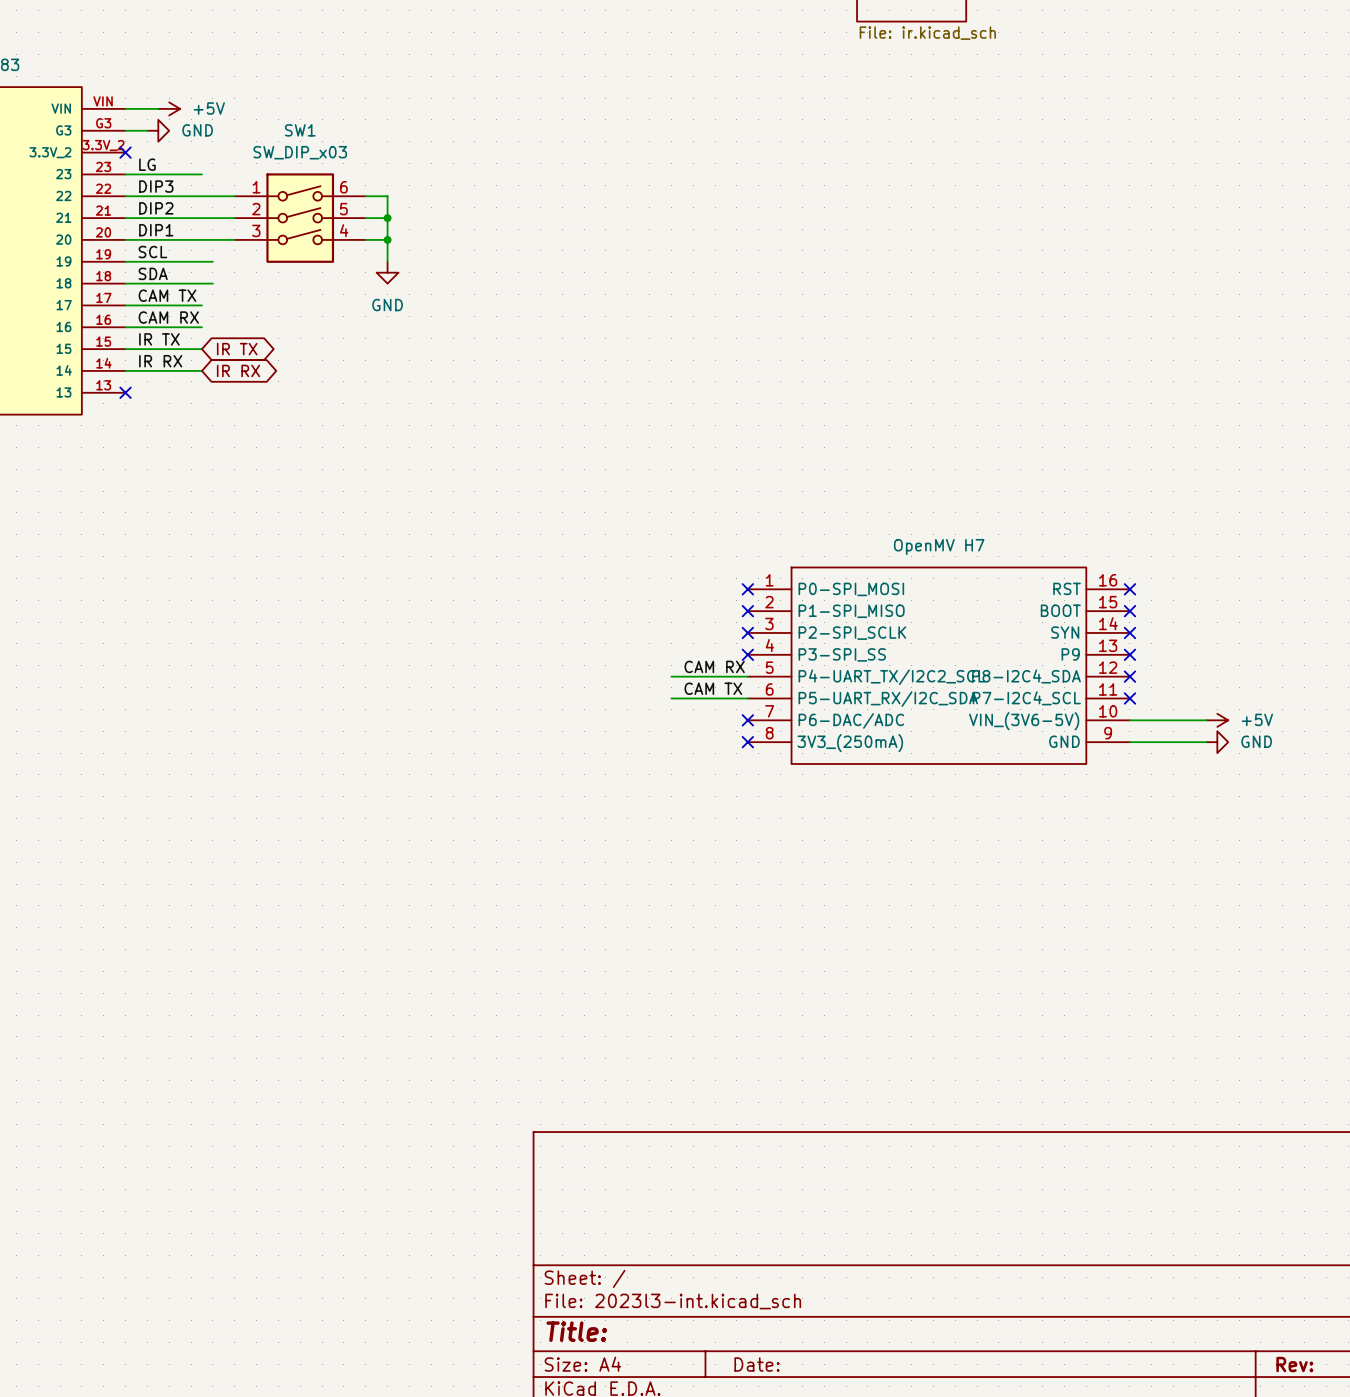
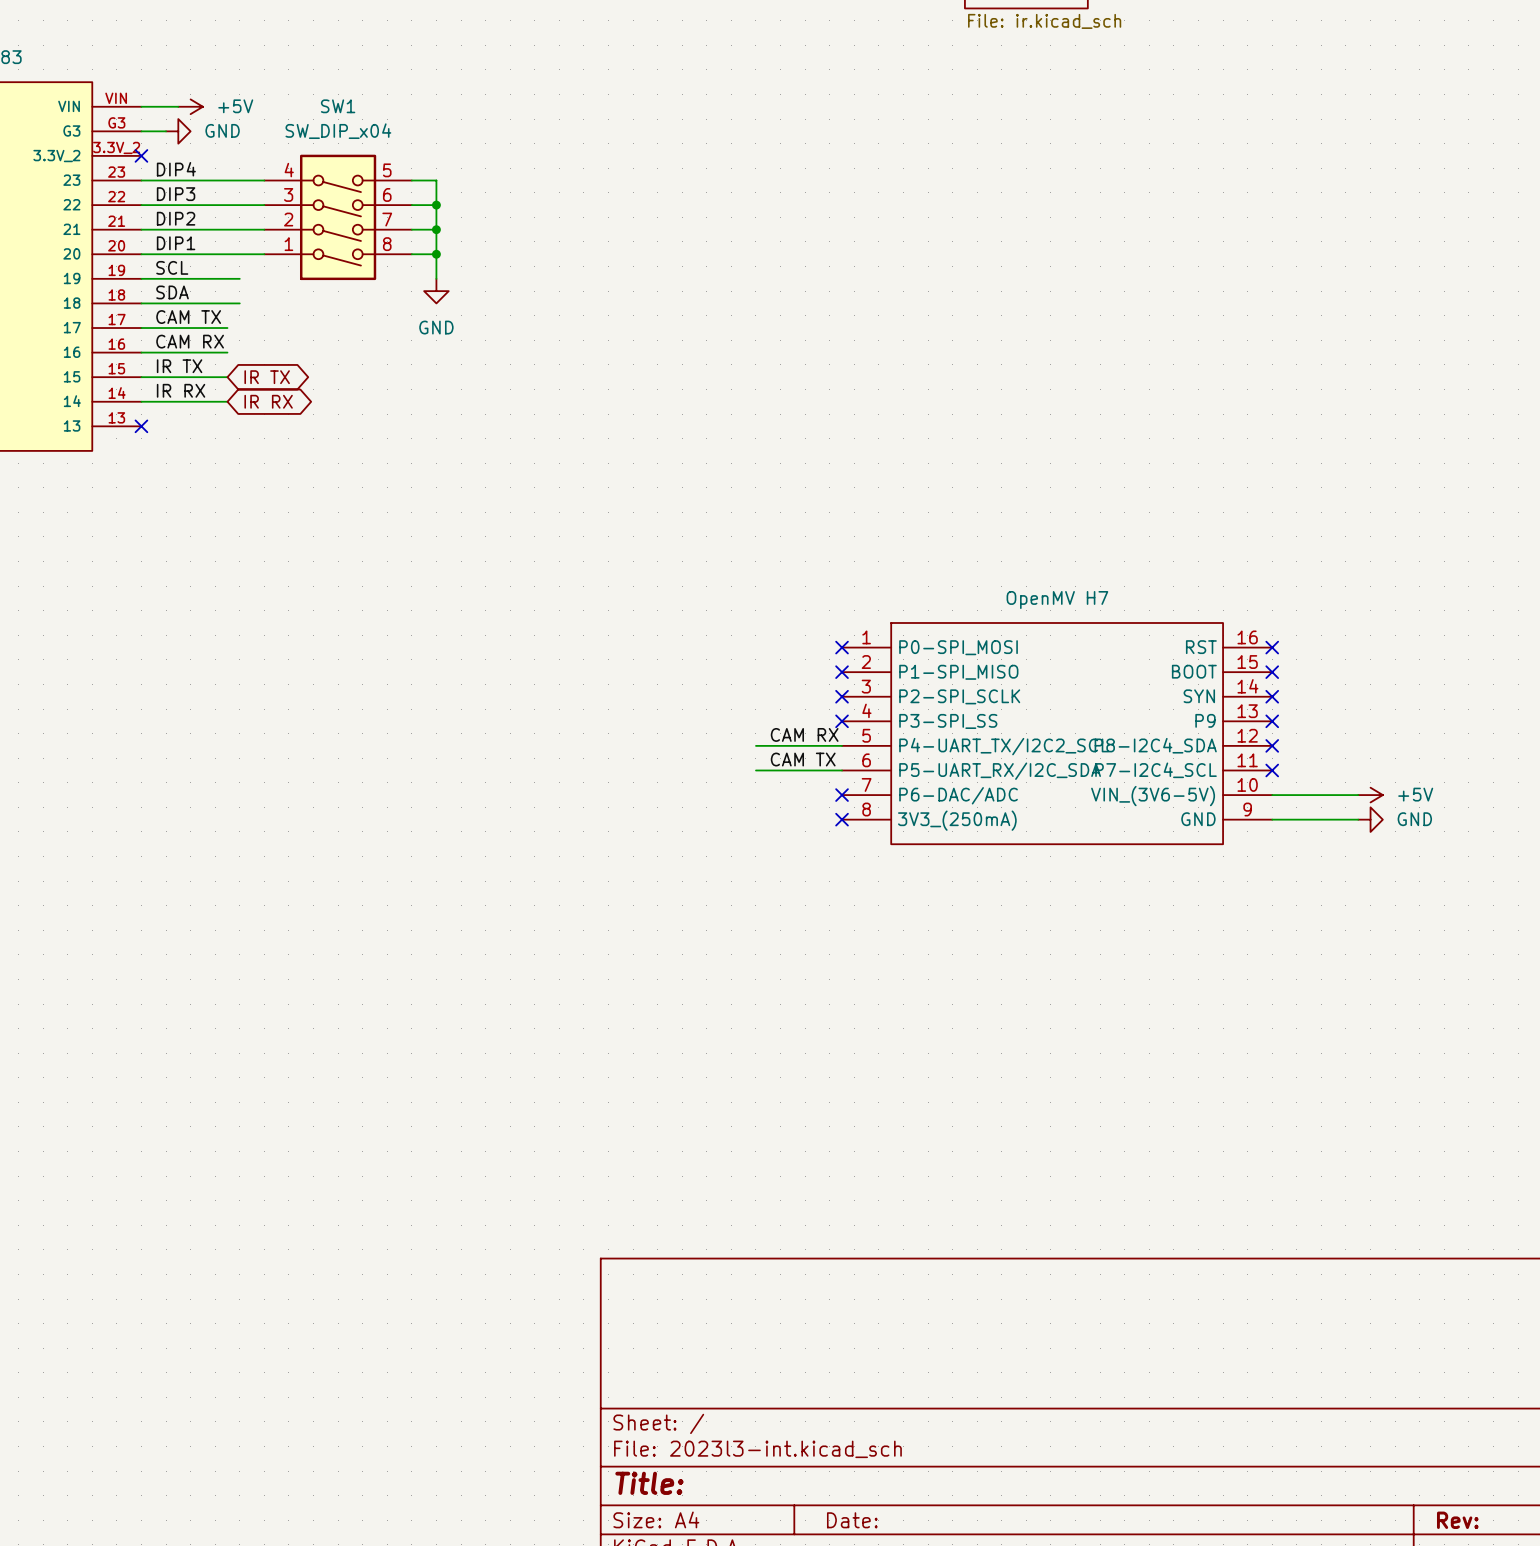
SW1 value: SW_DIP_x03 (300, 152) -> SW_DIP_x04 (338, 131)
label: LG (147, 164) -> DIP4 (176, 169)
SW1 symbol: [234, 173, 366, 263] -> [264, 154, 412, 281]
wire: none -> (227, 180) (264, 180)
wire: none -> (411, 180) (436, 180) (436, 205)
junction: none -> (436, 205)

